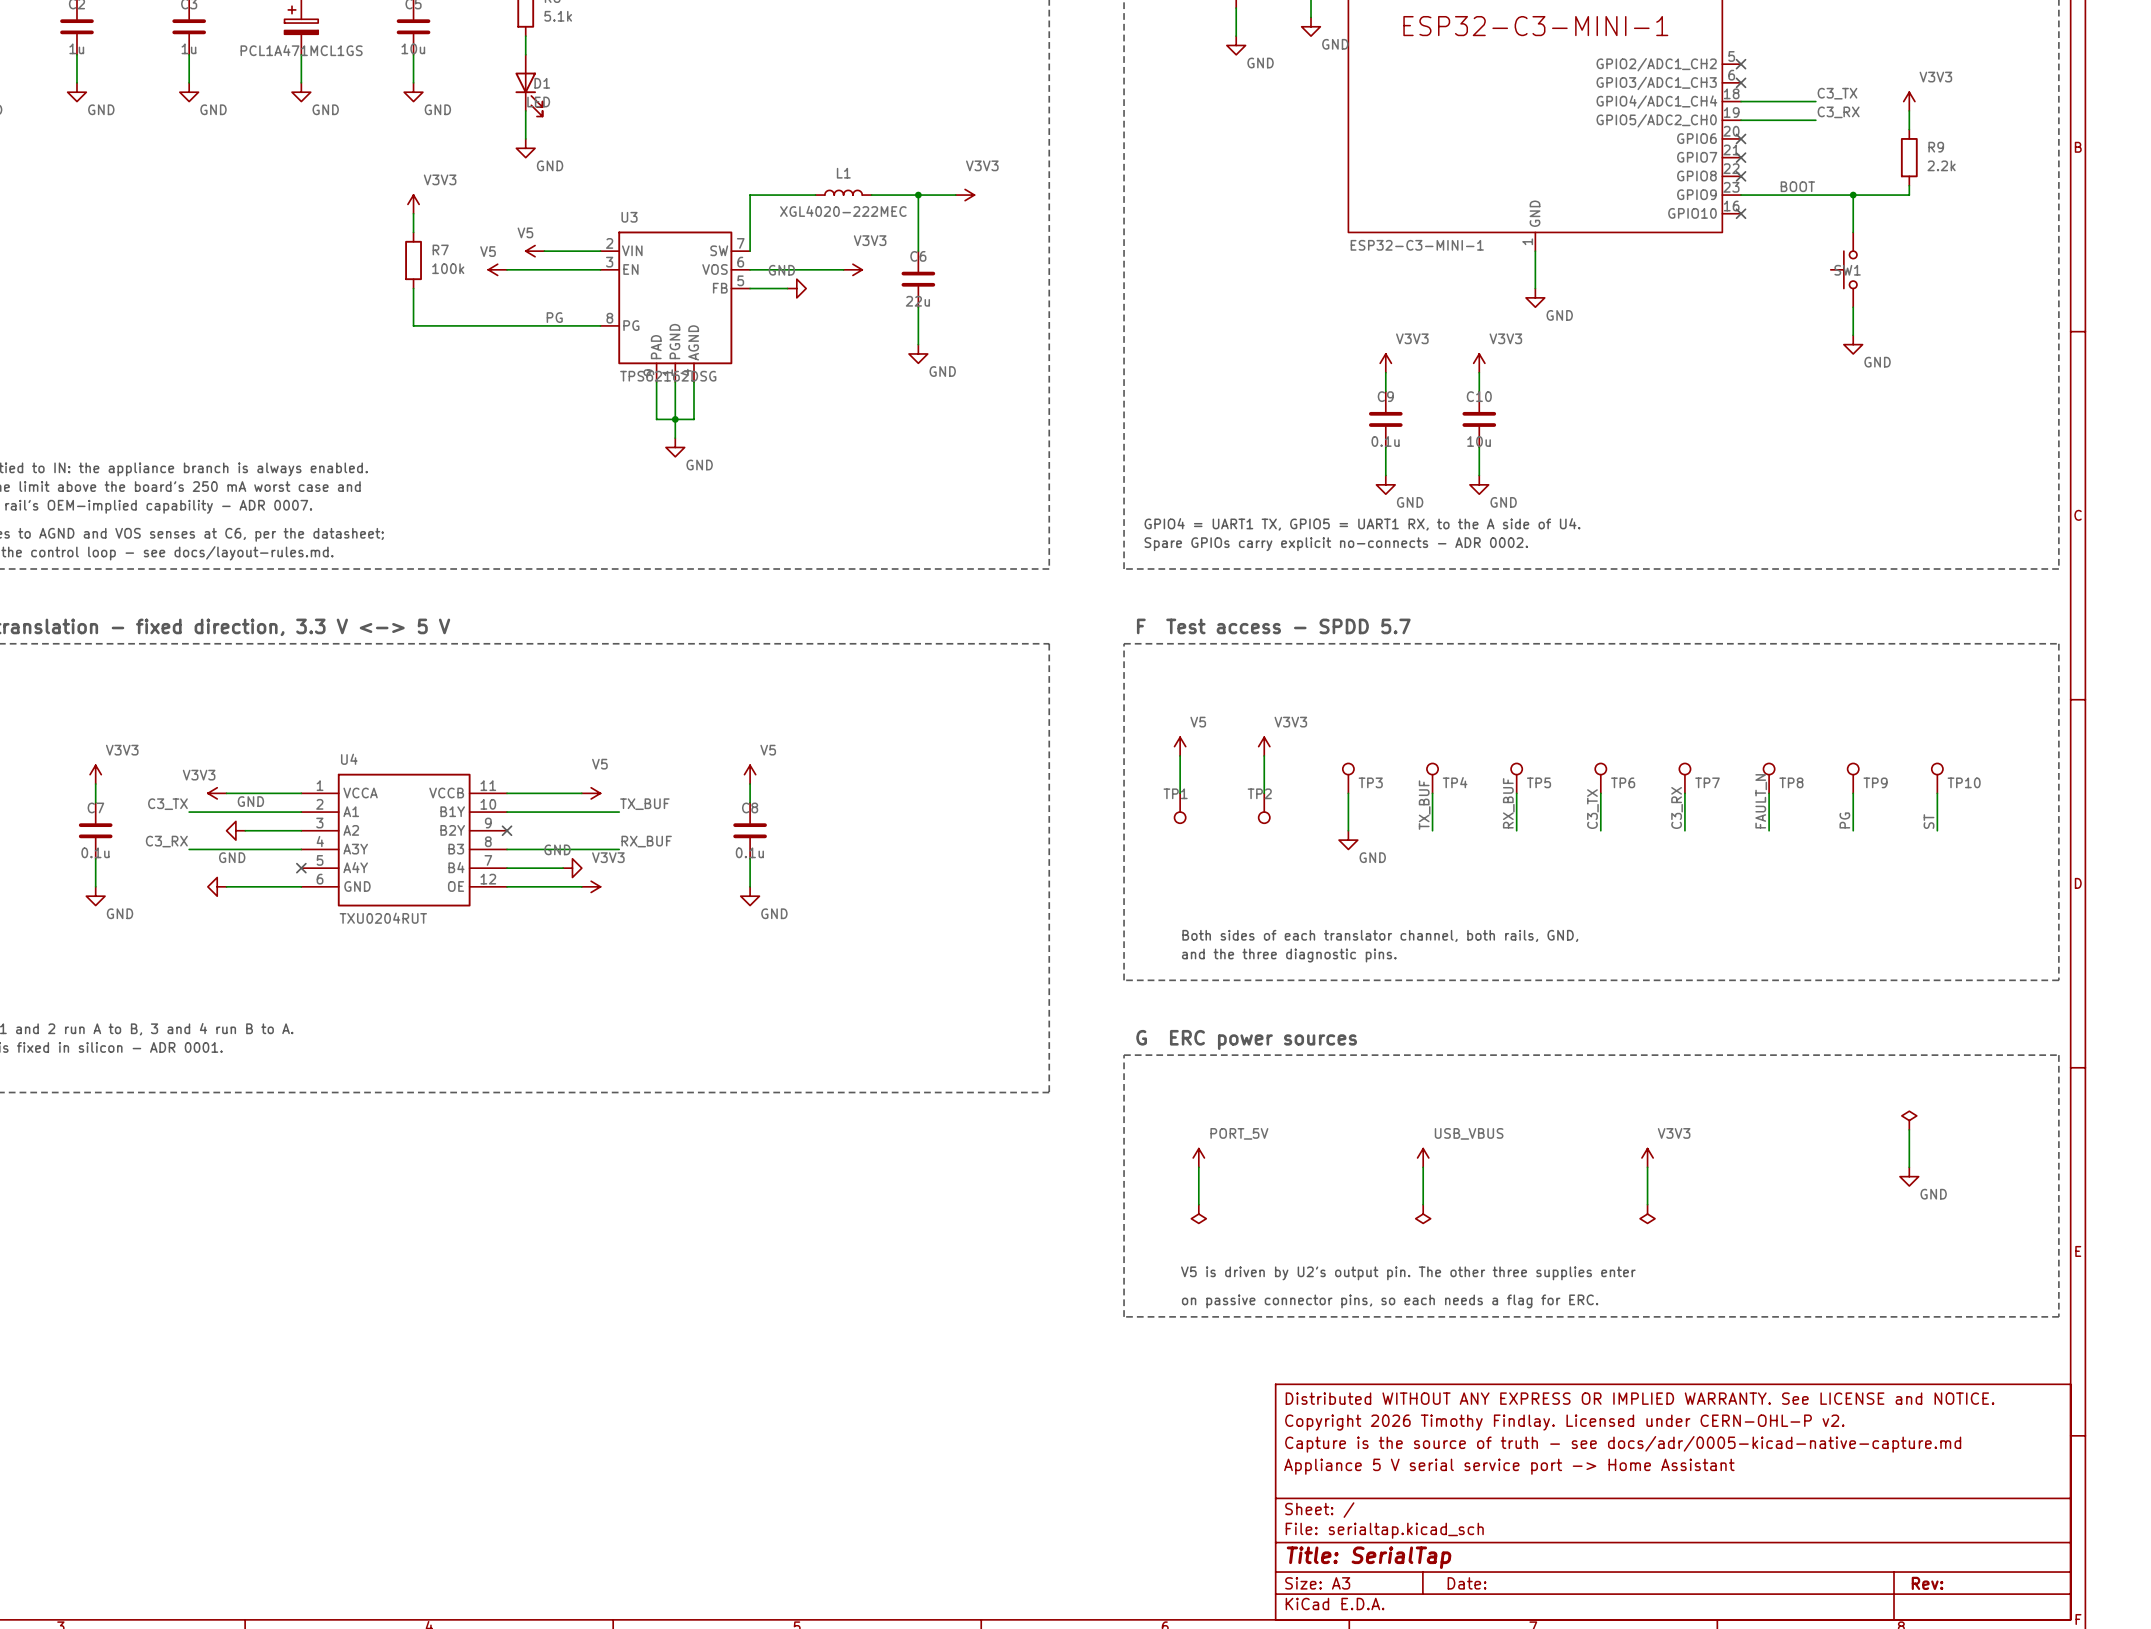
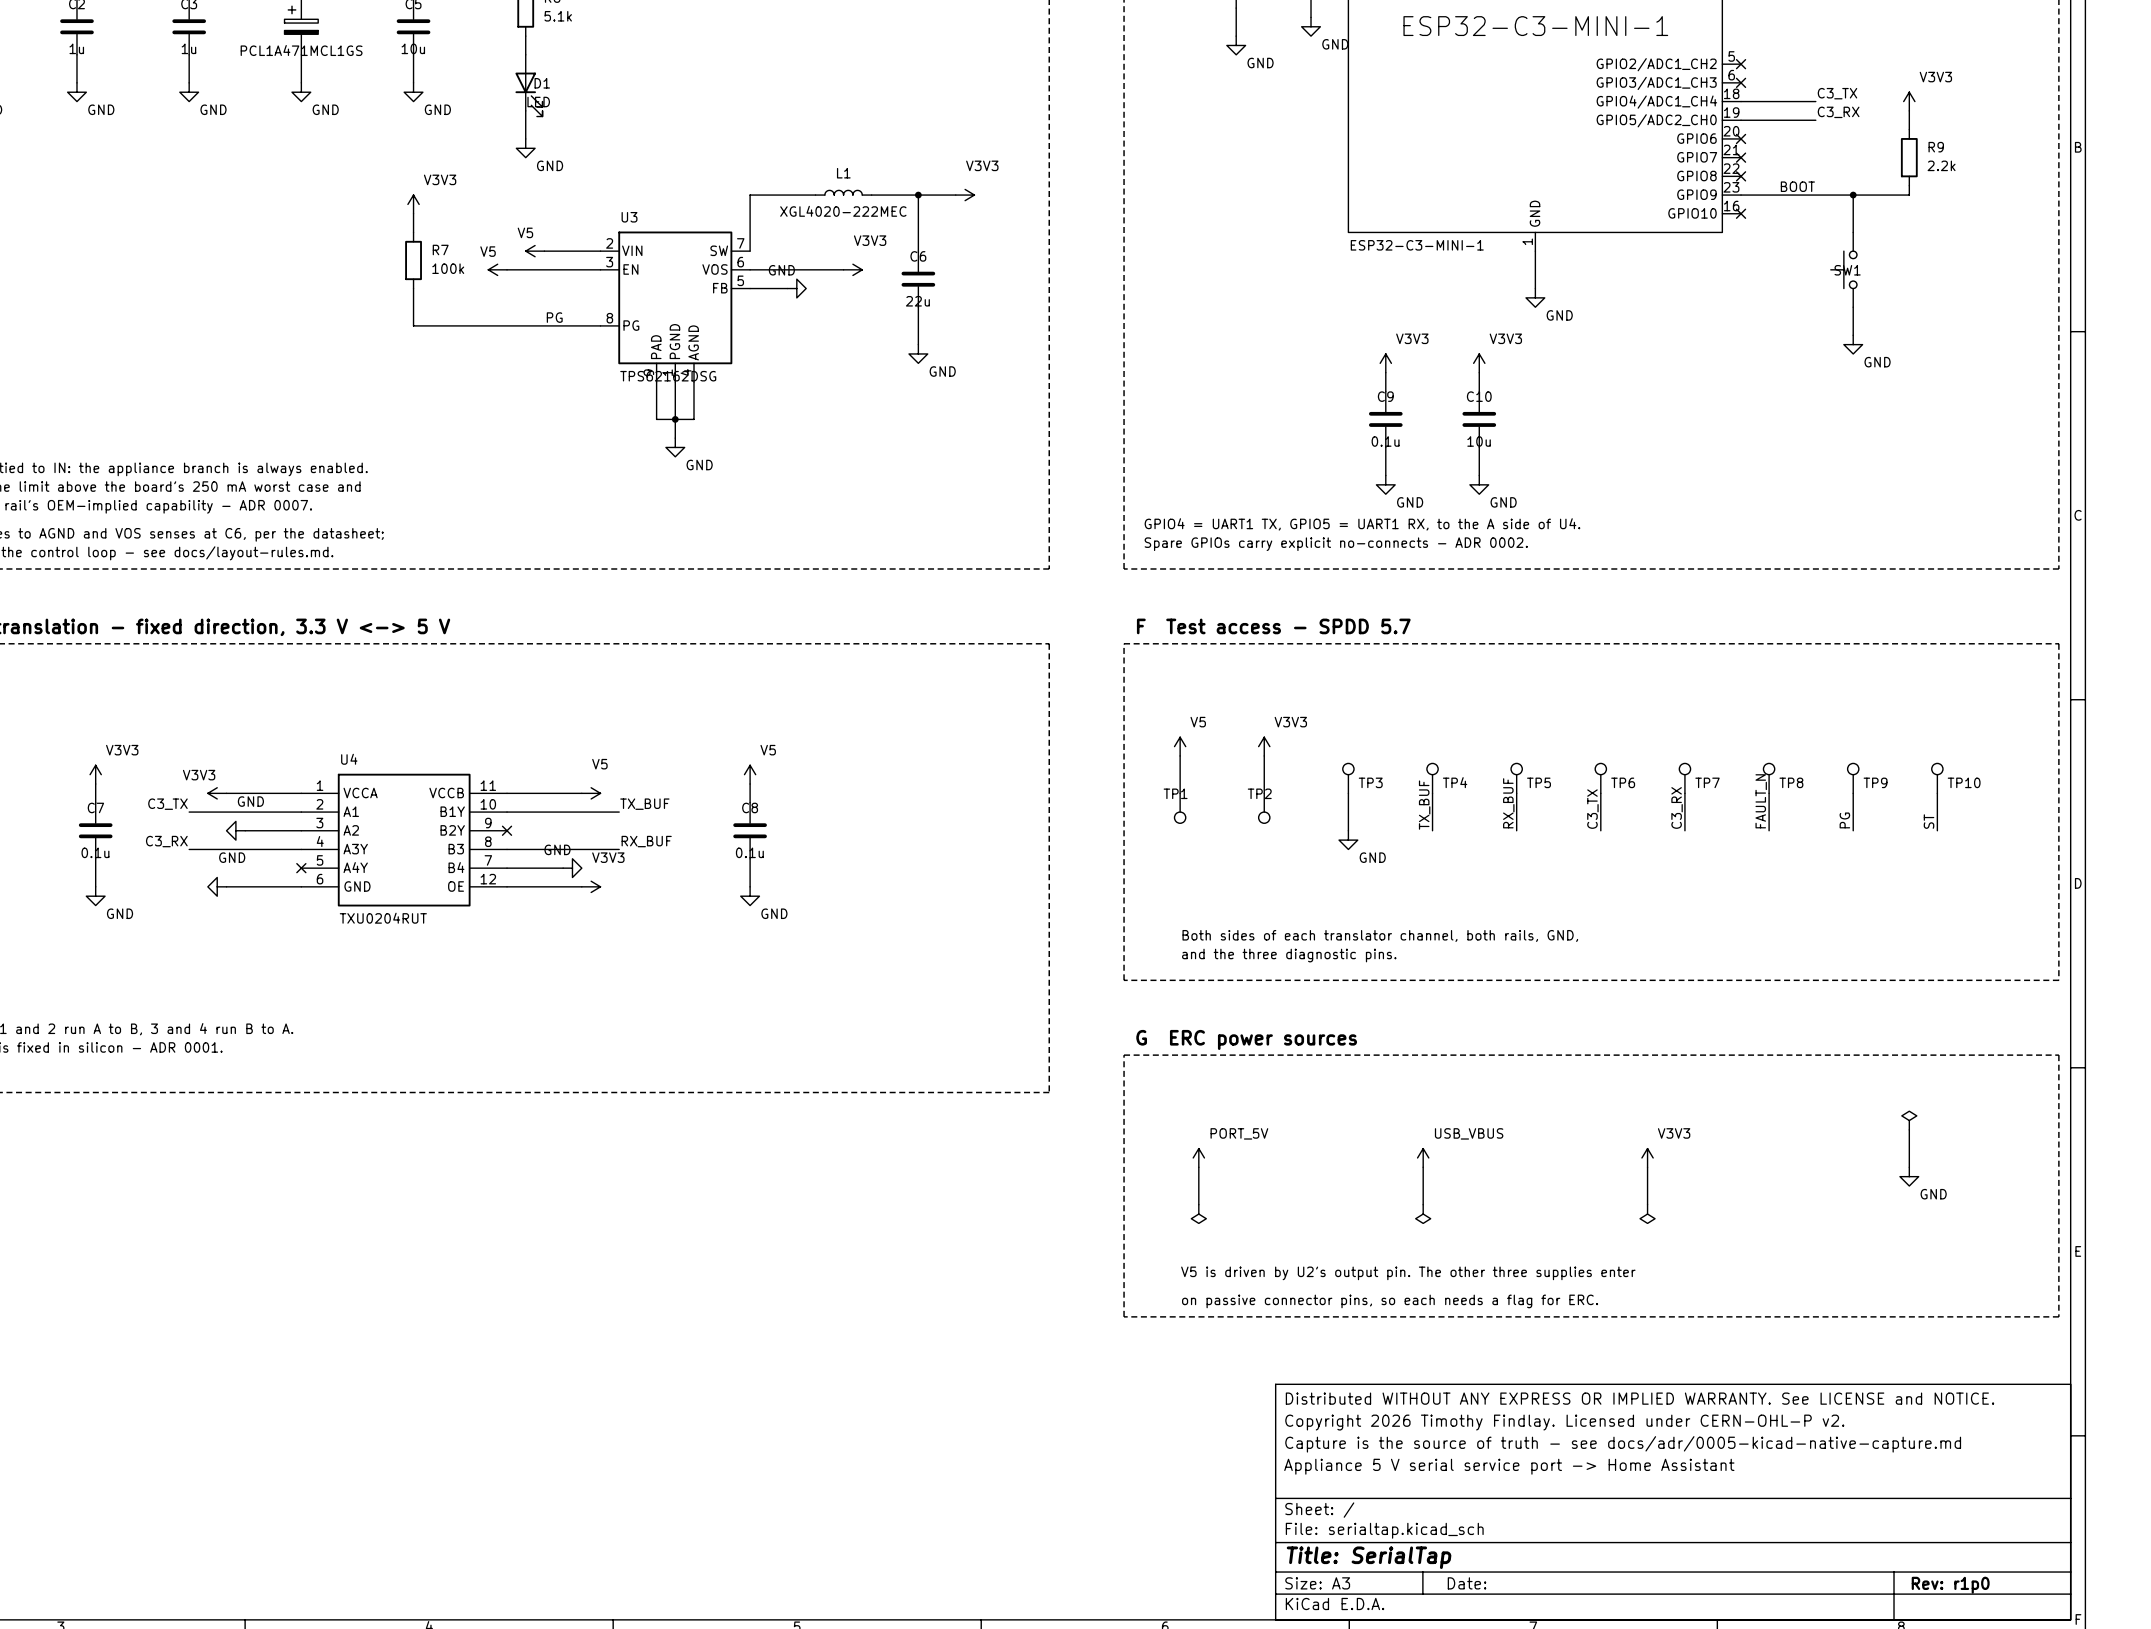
title block: Rev: (1927, 1583) -> Rev: r1p0 (1950, 1585)

